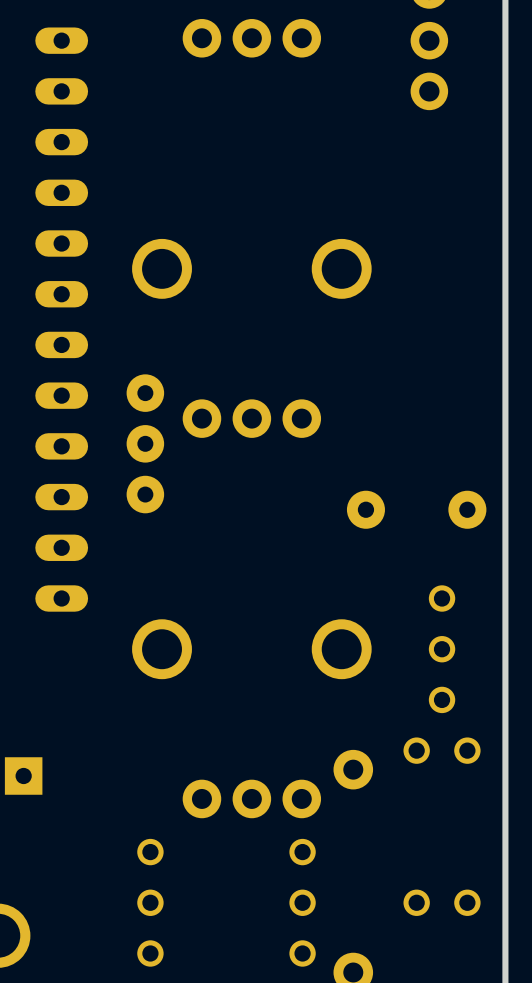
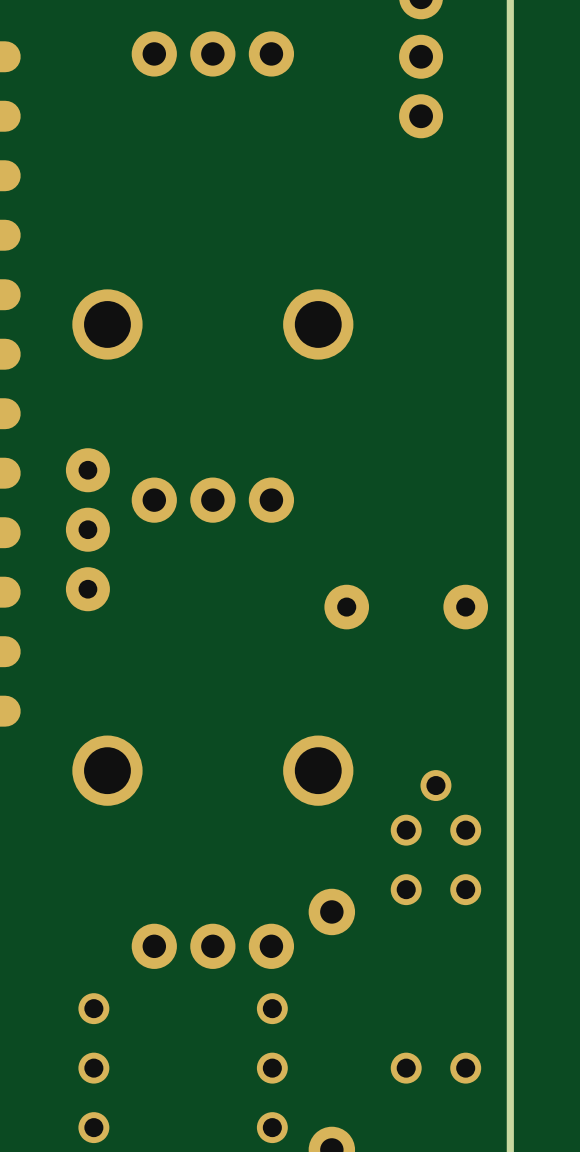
part: (442, 649) -> none
part: none -> (435, 807)

